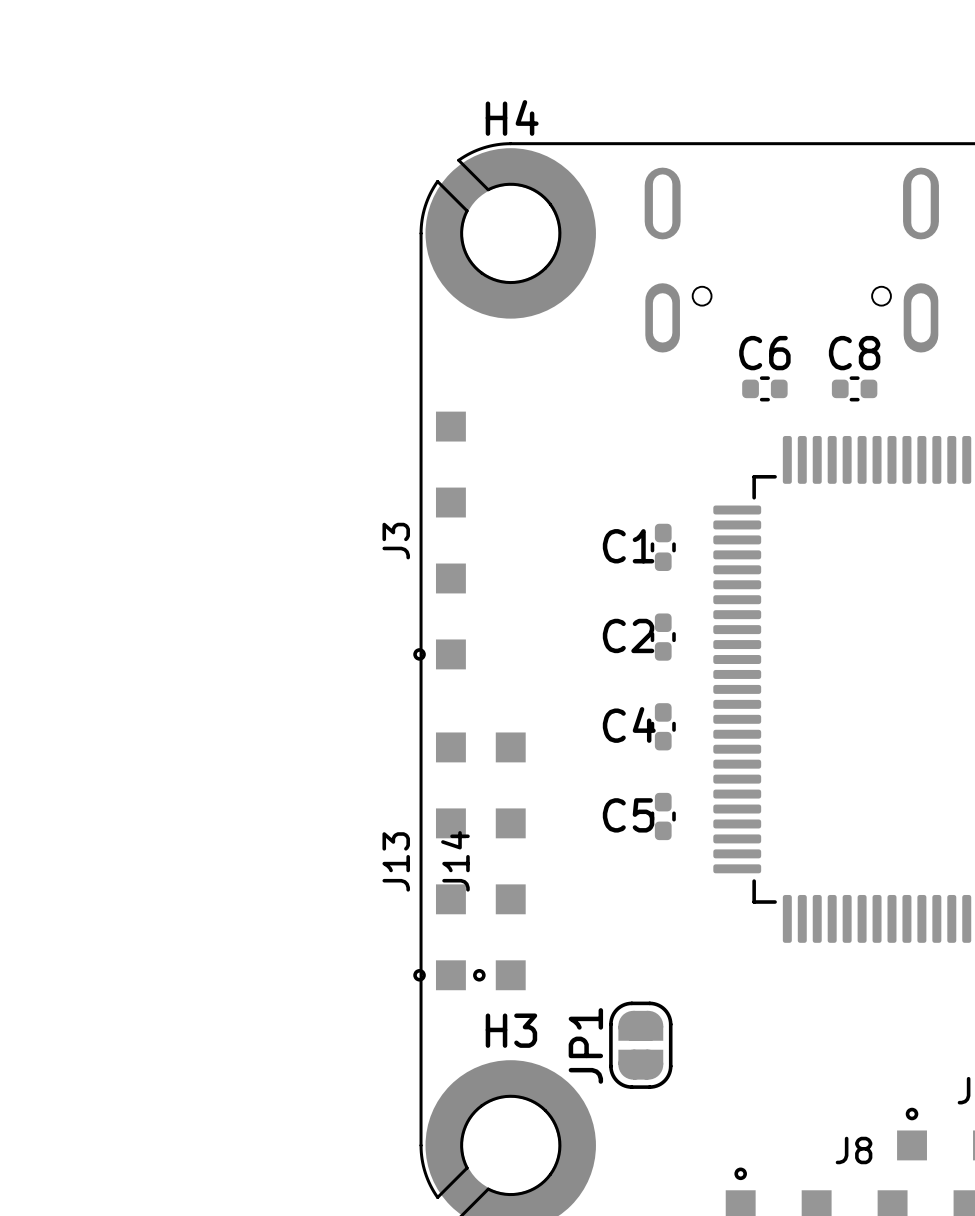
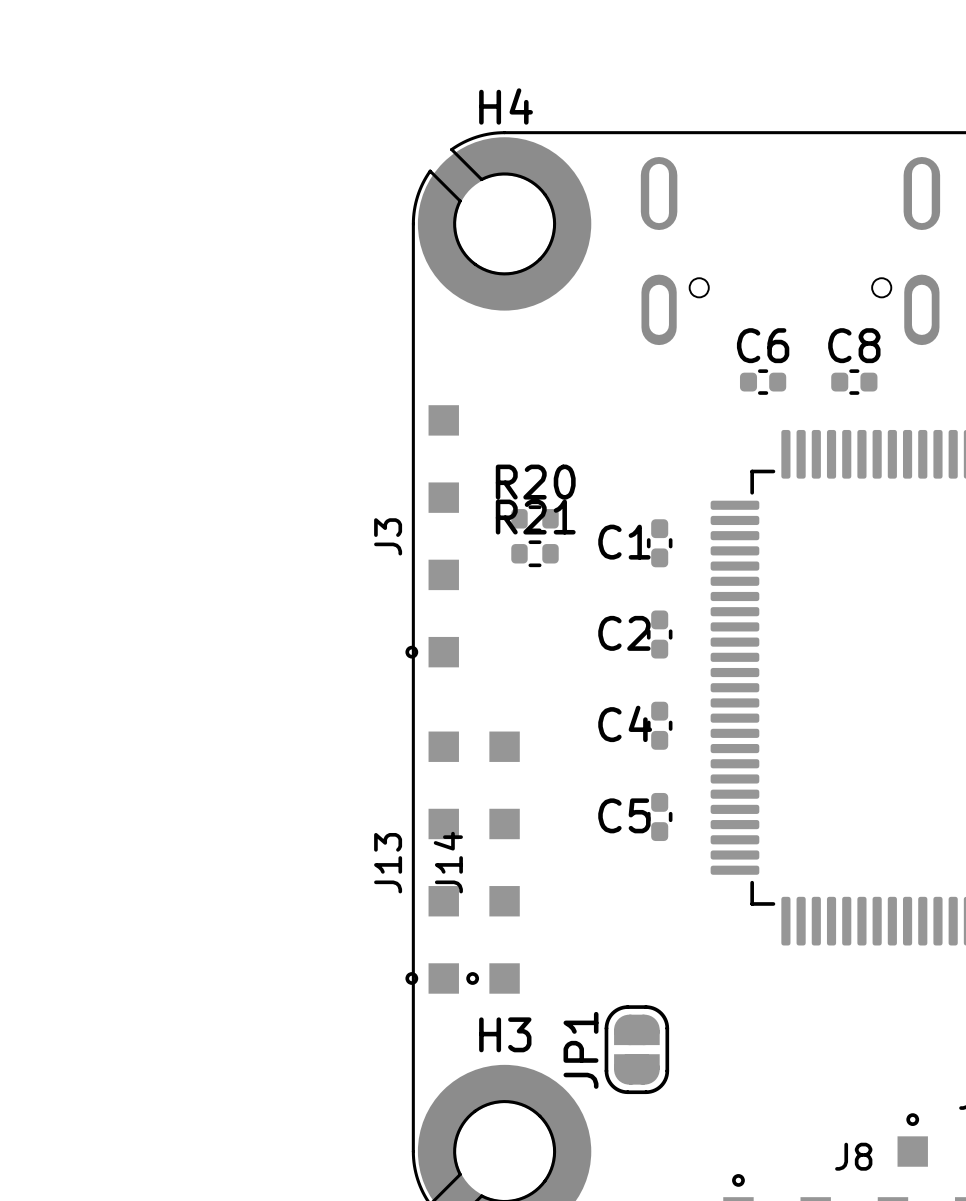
R20: none -> (534, 518)
R21: none -> (534, 553)

